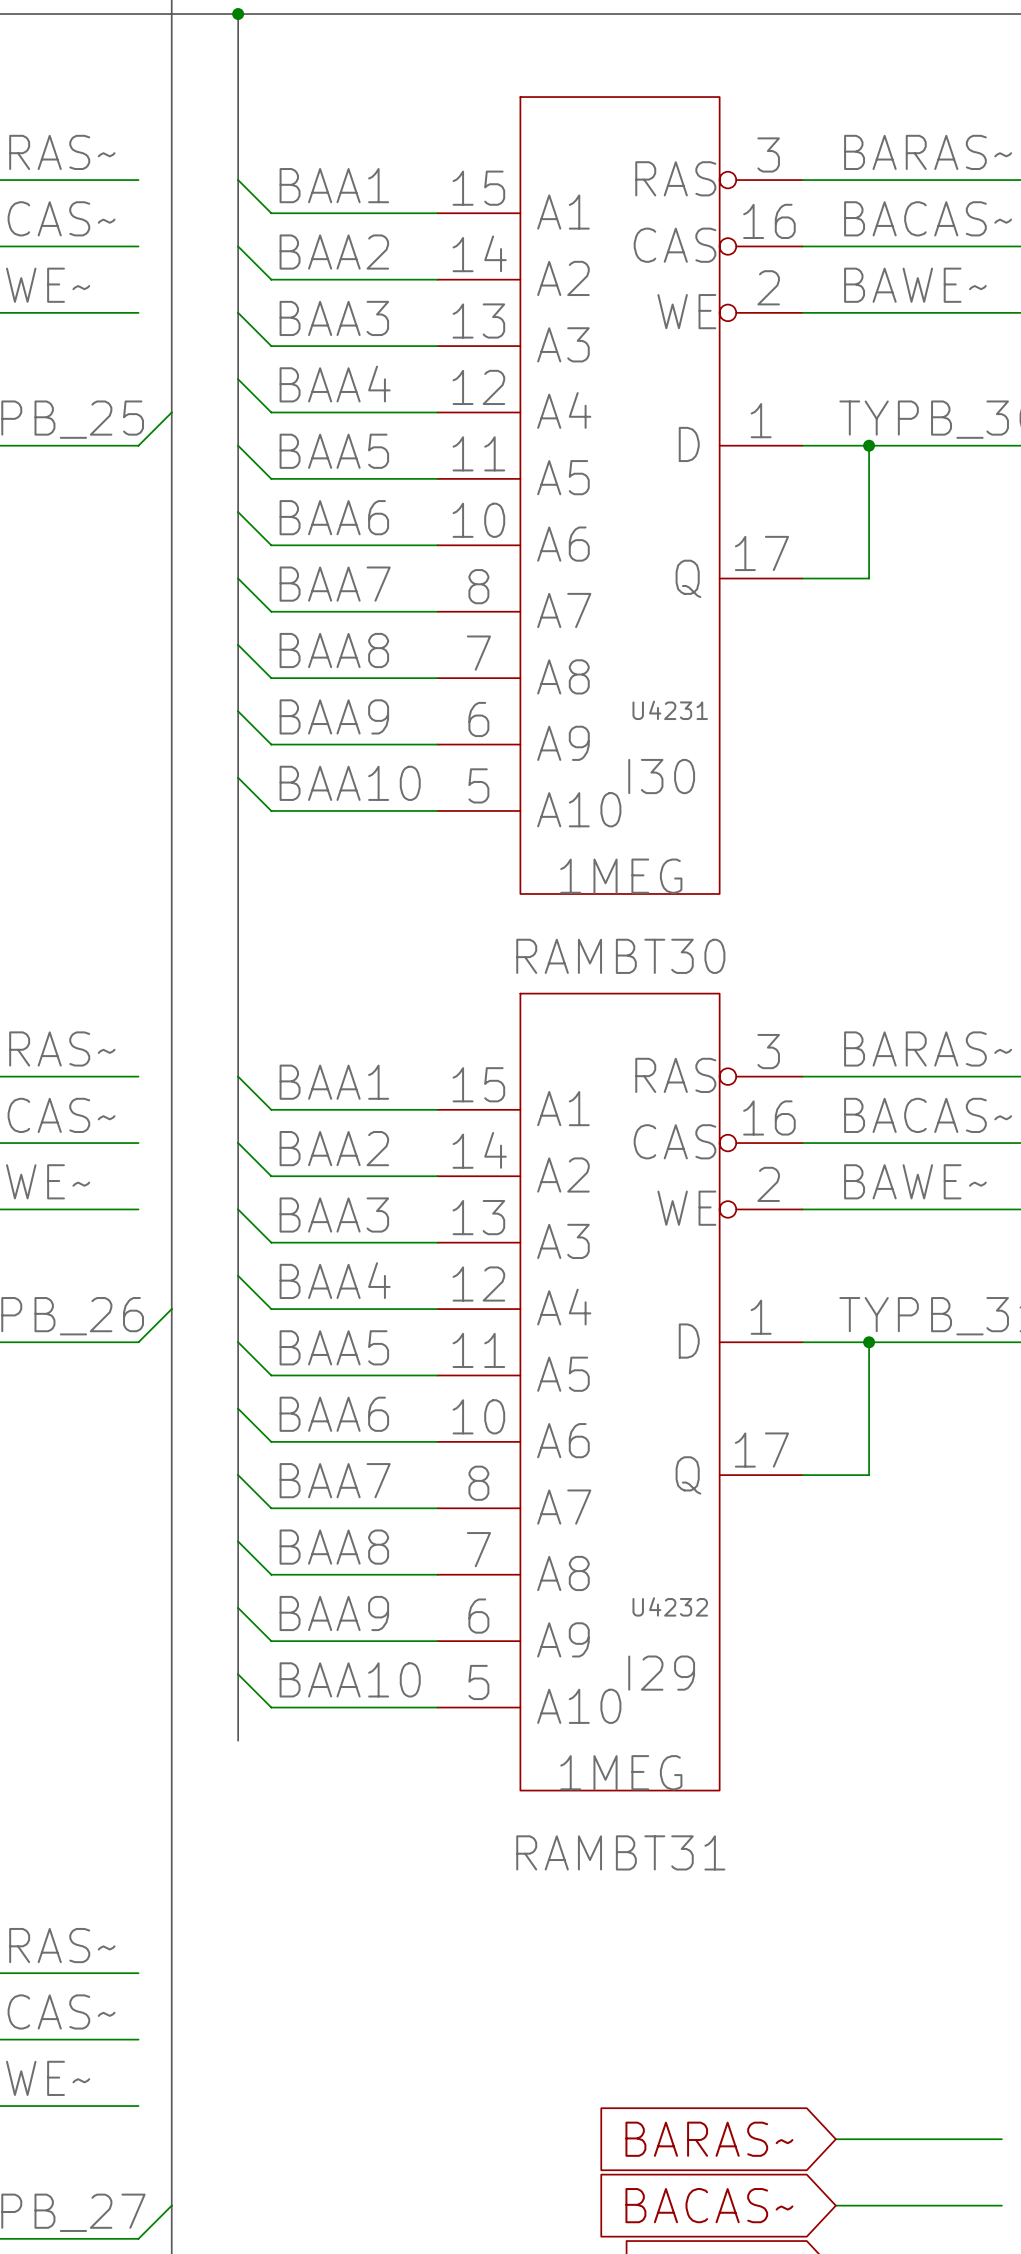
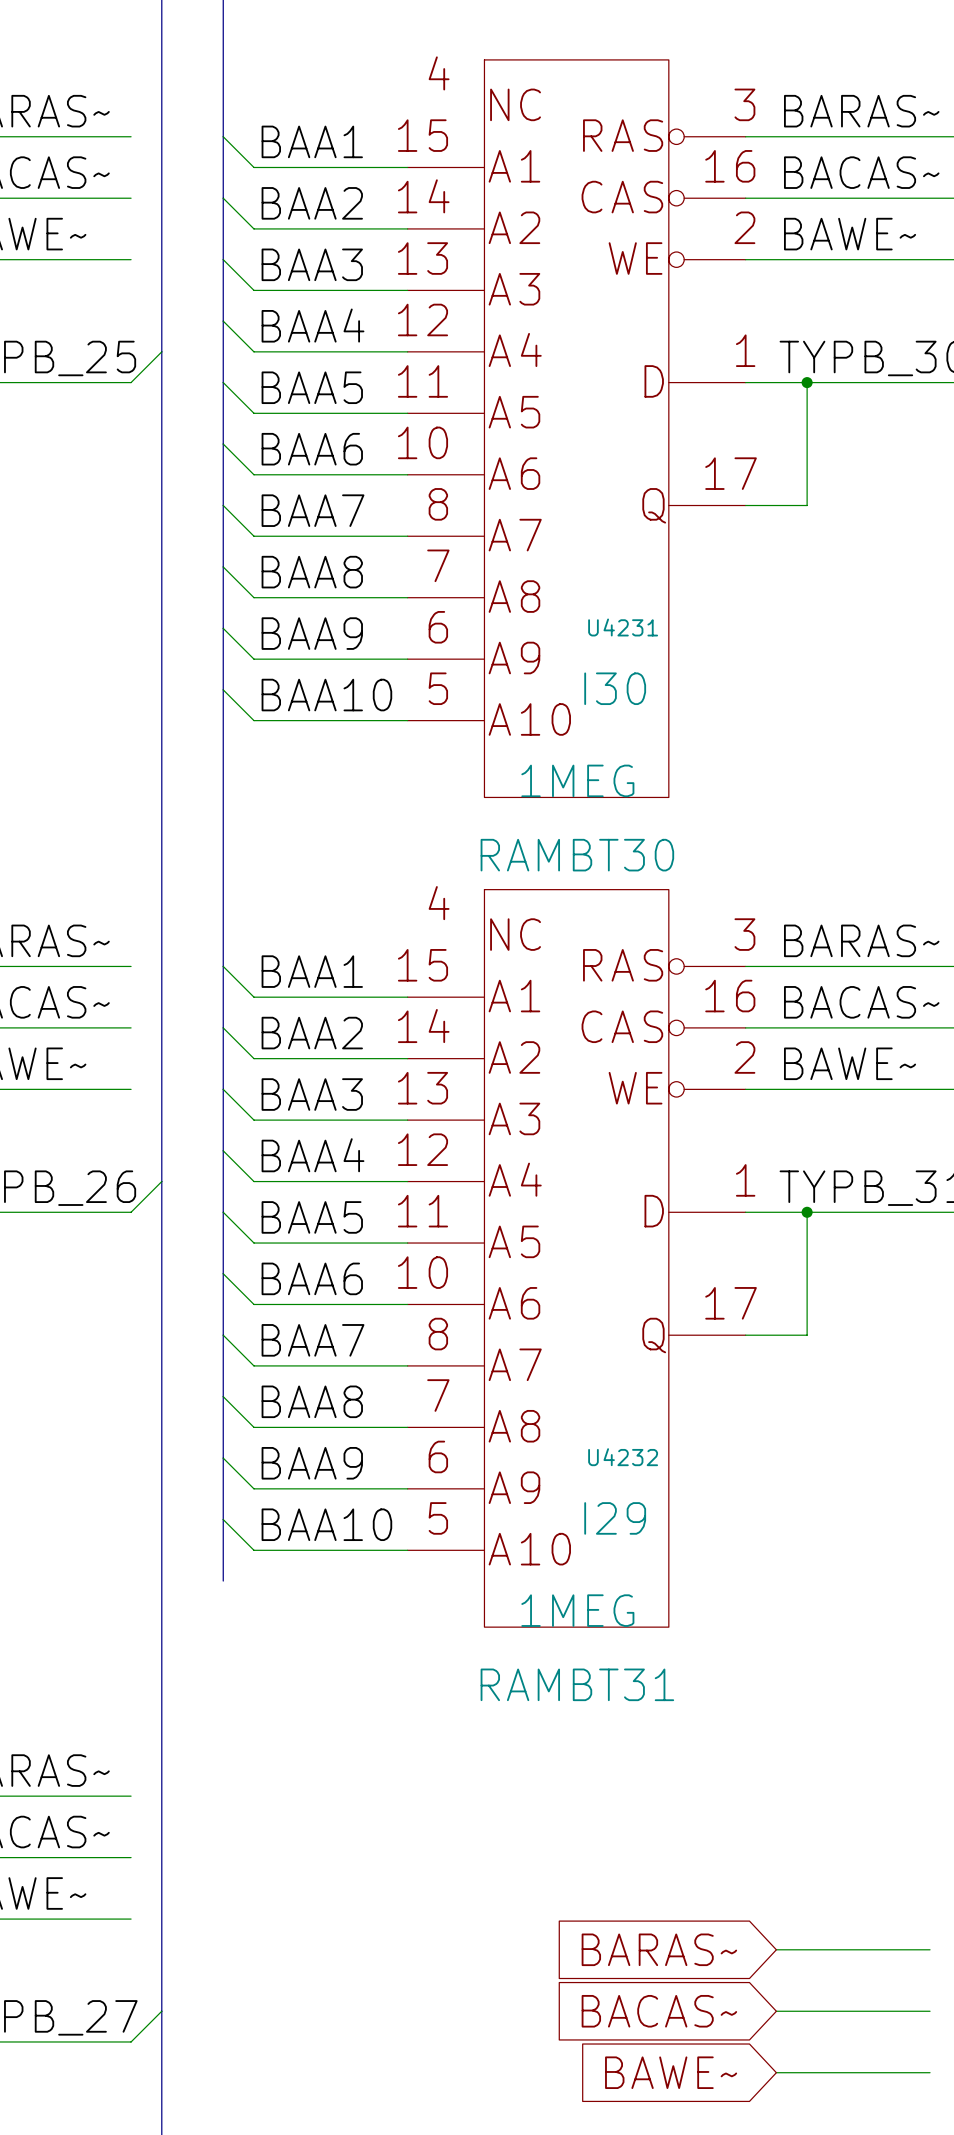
U4231 symbol: [437, 97, 803, 894] -> [407, 59, 746, 798]
U4232 symbol: [437, 993, 803, 1791] -> [407, 889, 746, 1628]

